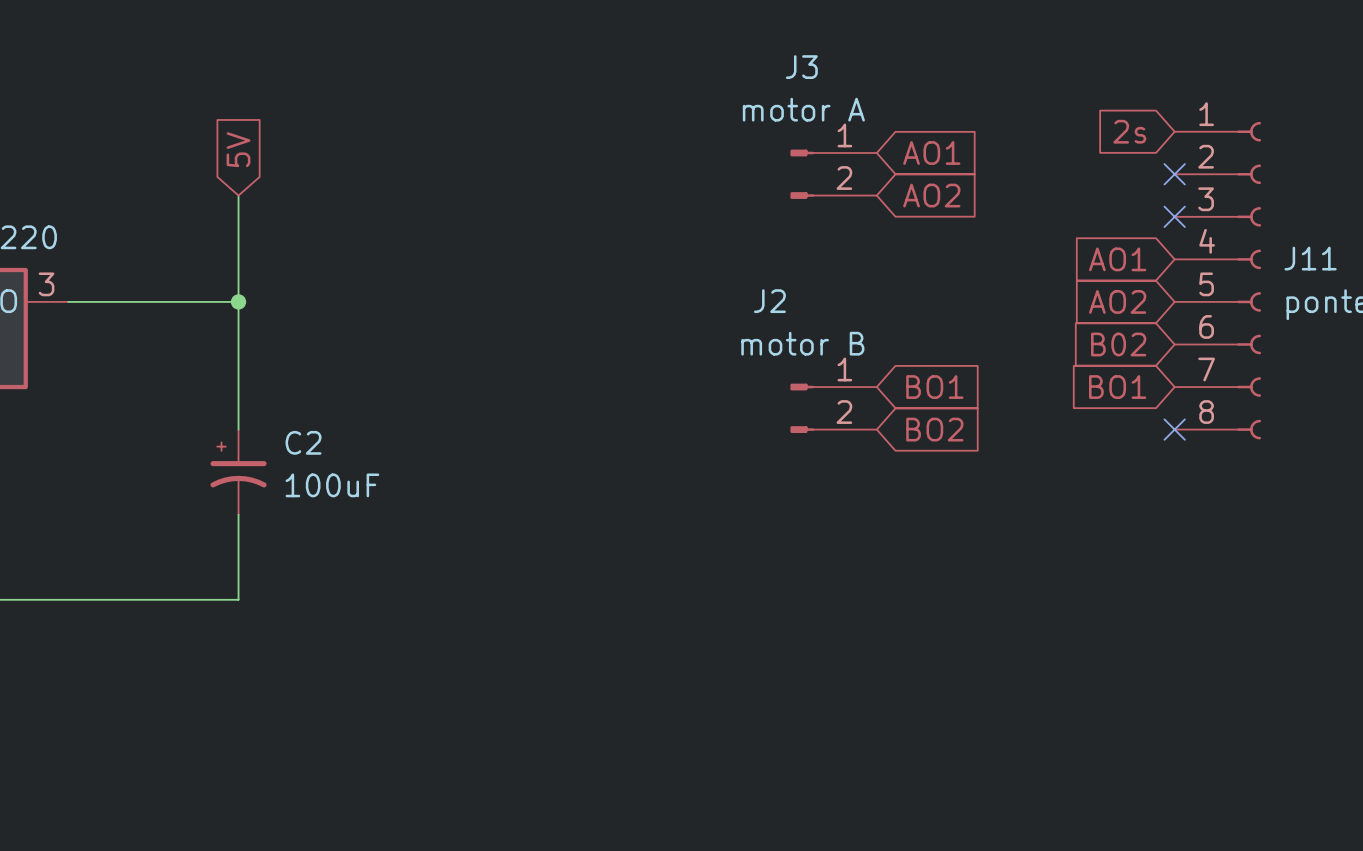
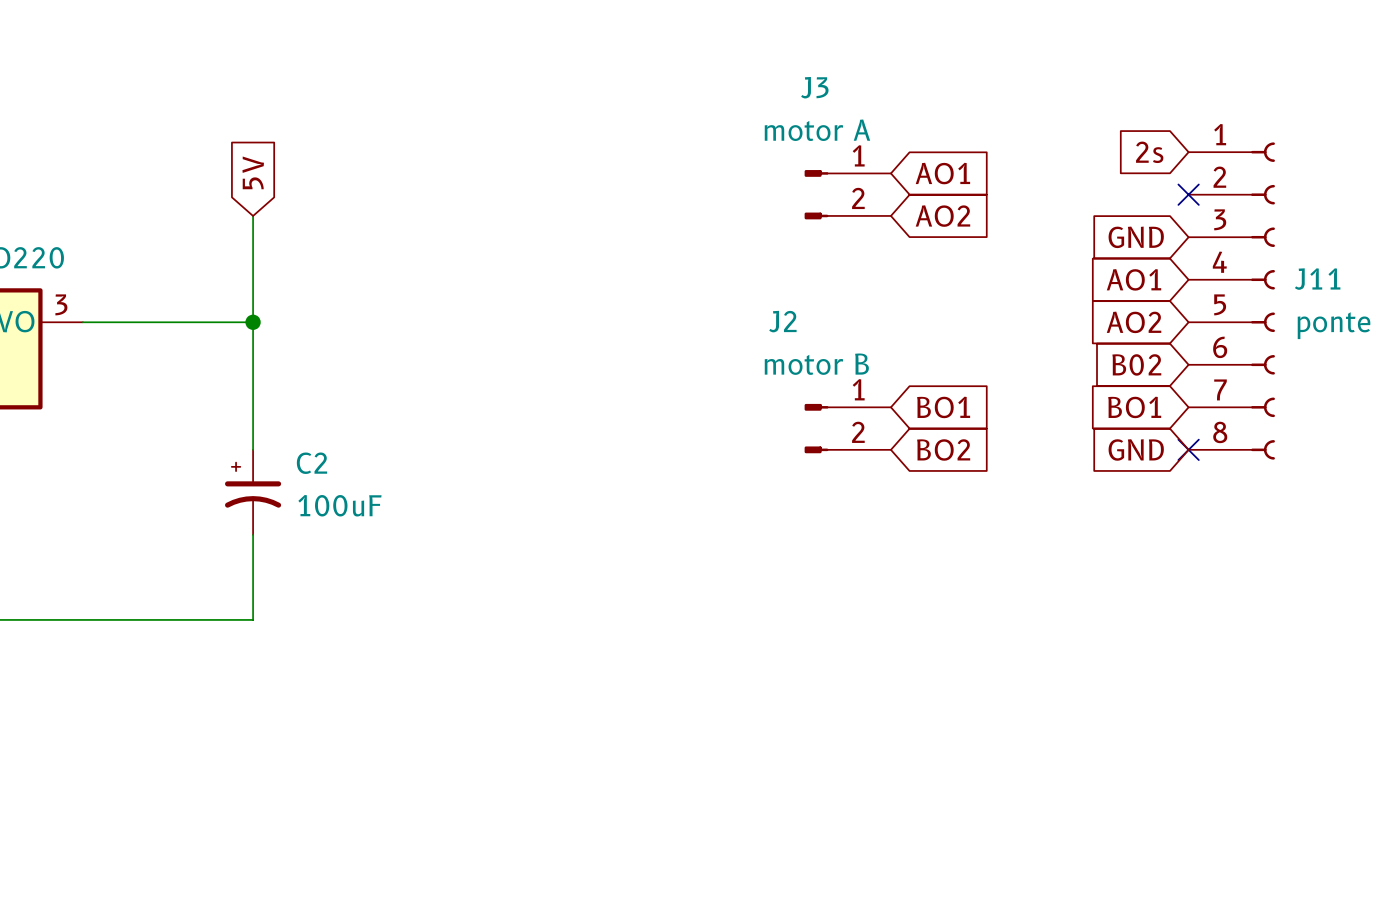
global label: none -> GND (1136, 237)
no-connect mark: (1174, 216) -> none
global label: none -> GND (1136, 449)

